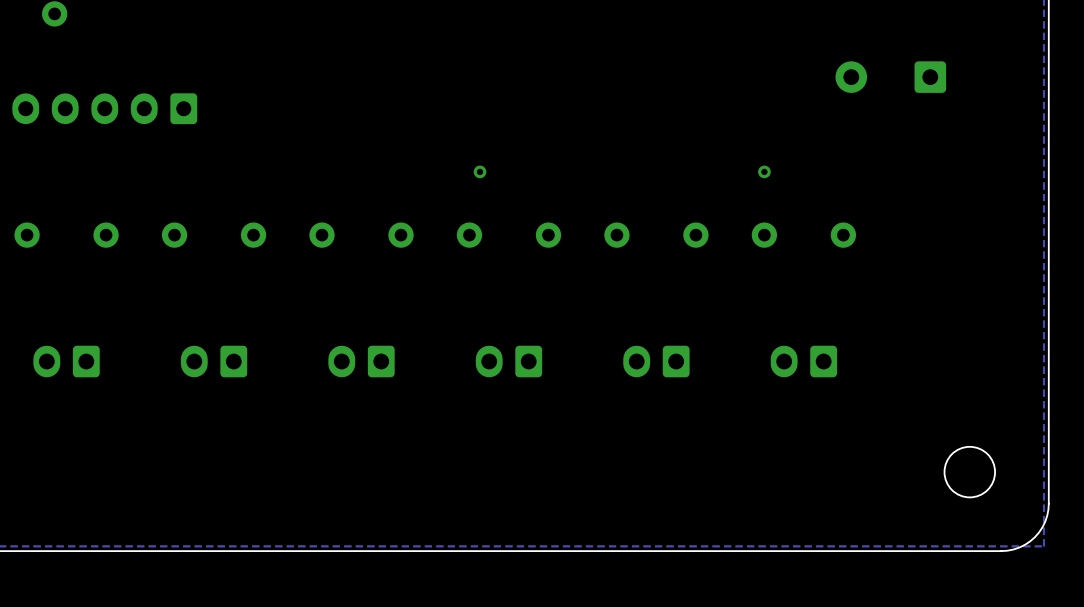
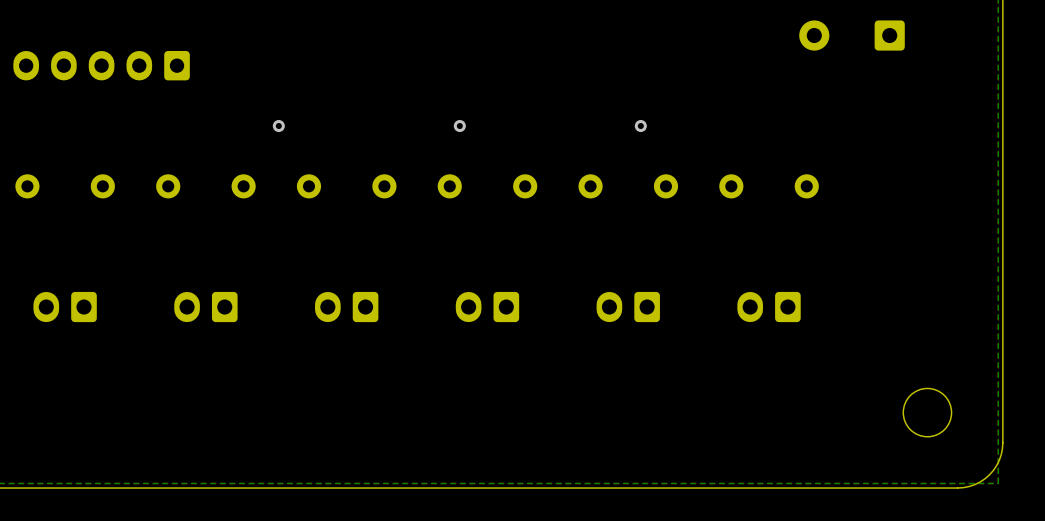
via: none -> (278, 126)
via position: (764, 171) -> (640, 126)

